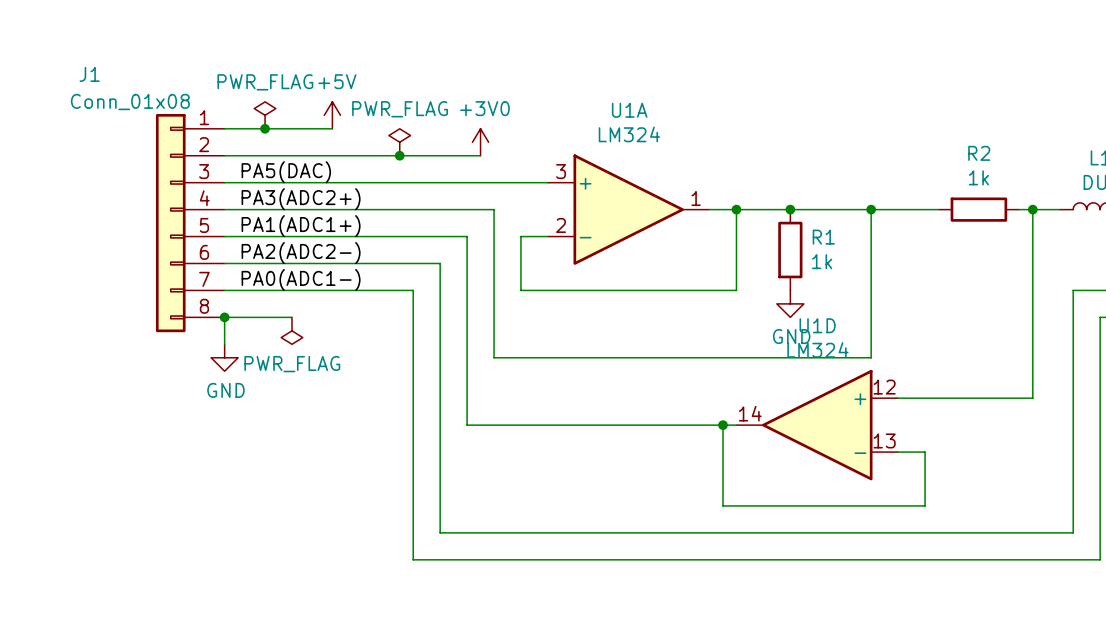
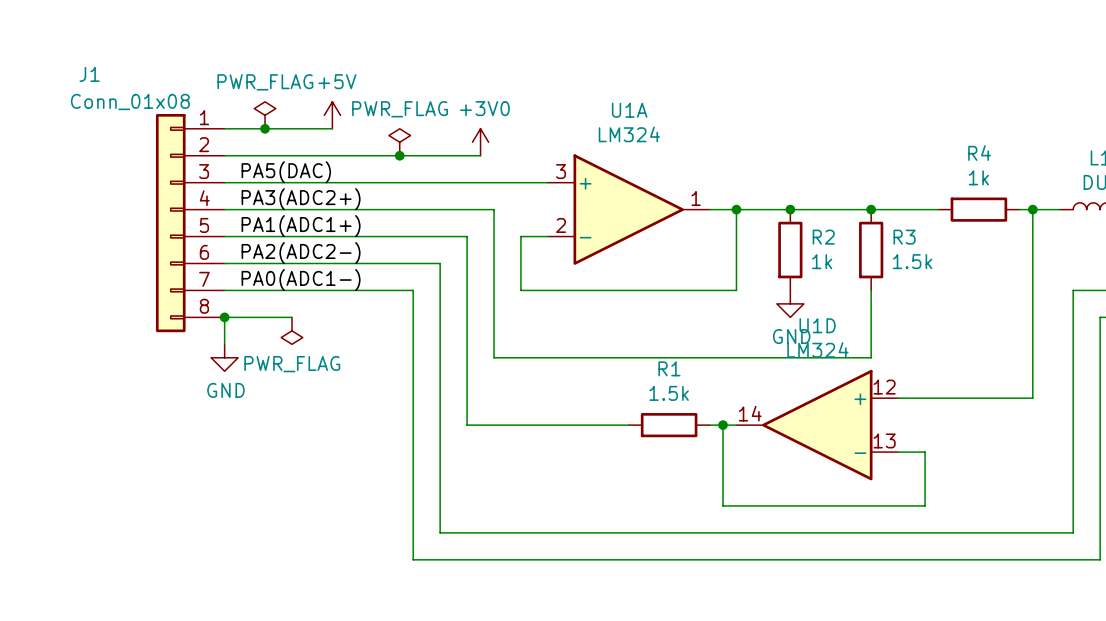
R2 name: R2 (979, 153) -> R4 (979, 153)
wire: (871, 209) (871, 290) -> none
R1 name: R1 (823, 237) -> R2 (823, 237)
R3: none -> 1.5k (871, 250)
wire: (628, 425) (709, 425) -> none
R1: none -> 1.5k (669, 425)

